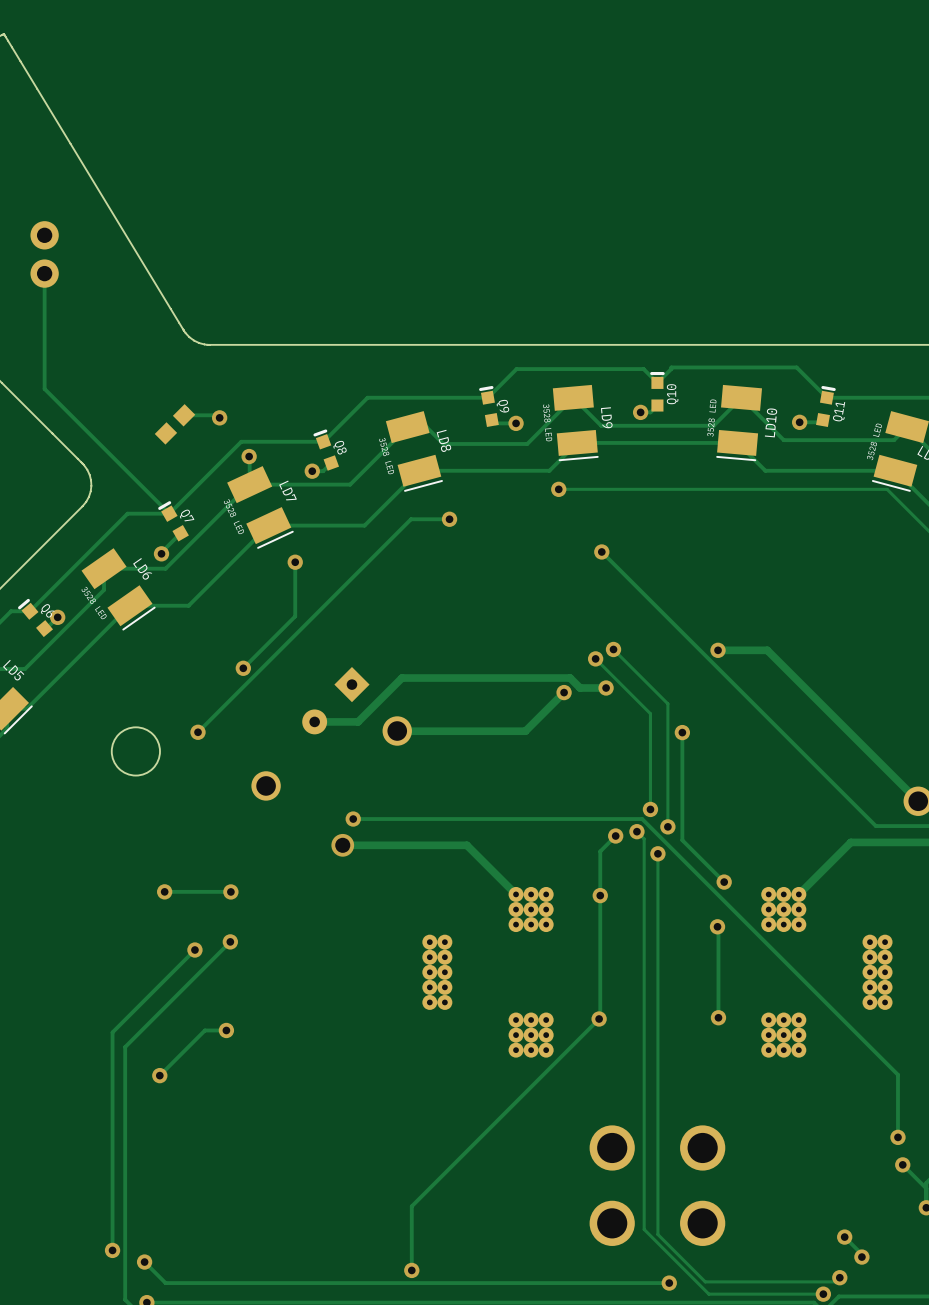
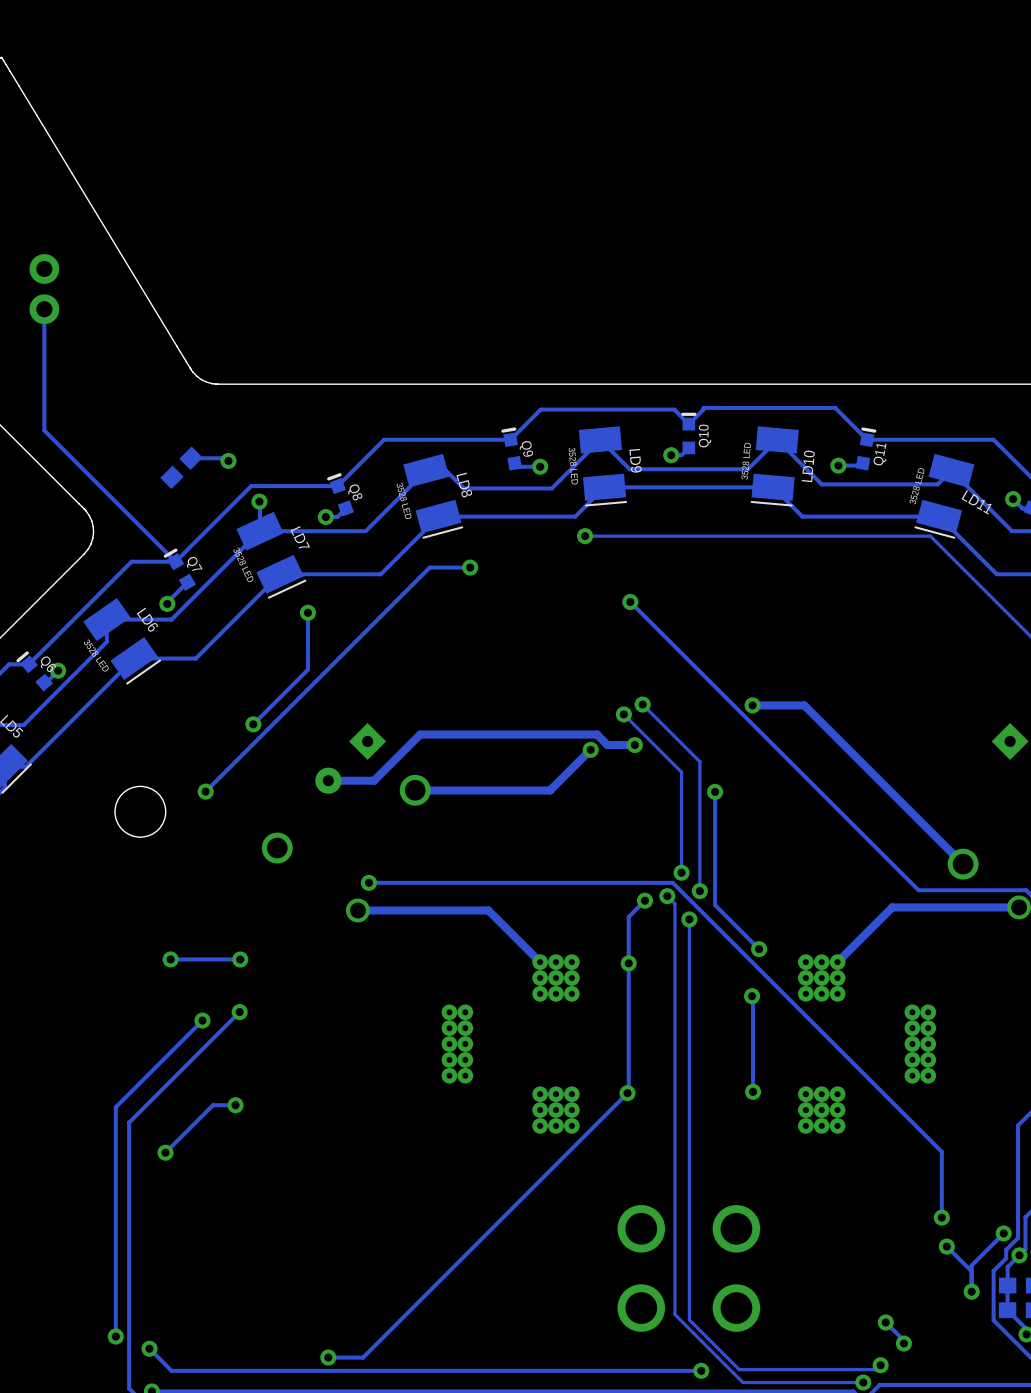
track: (411, 1206) (411, 1270) -> (430, 1290) (363, 1357) (328, 1357)
via: none -> (328, 1357)
via: (411, 1270) -> none

